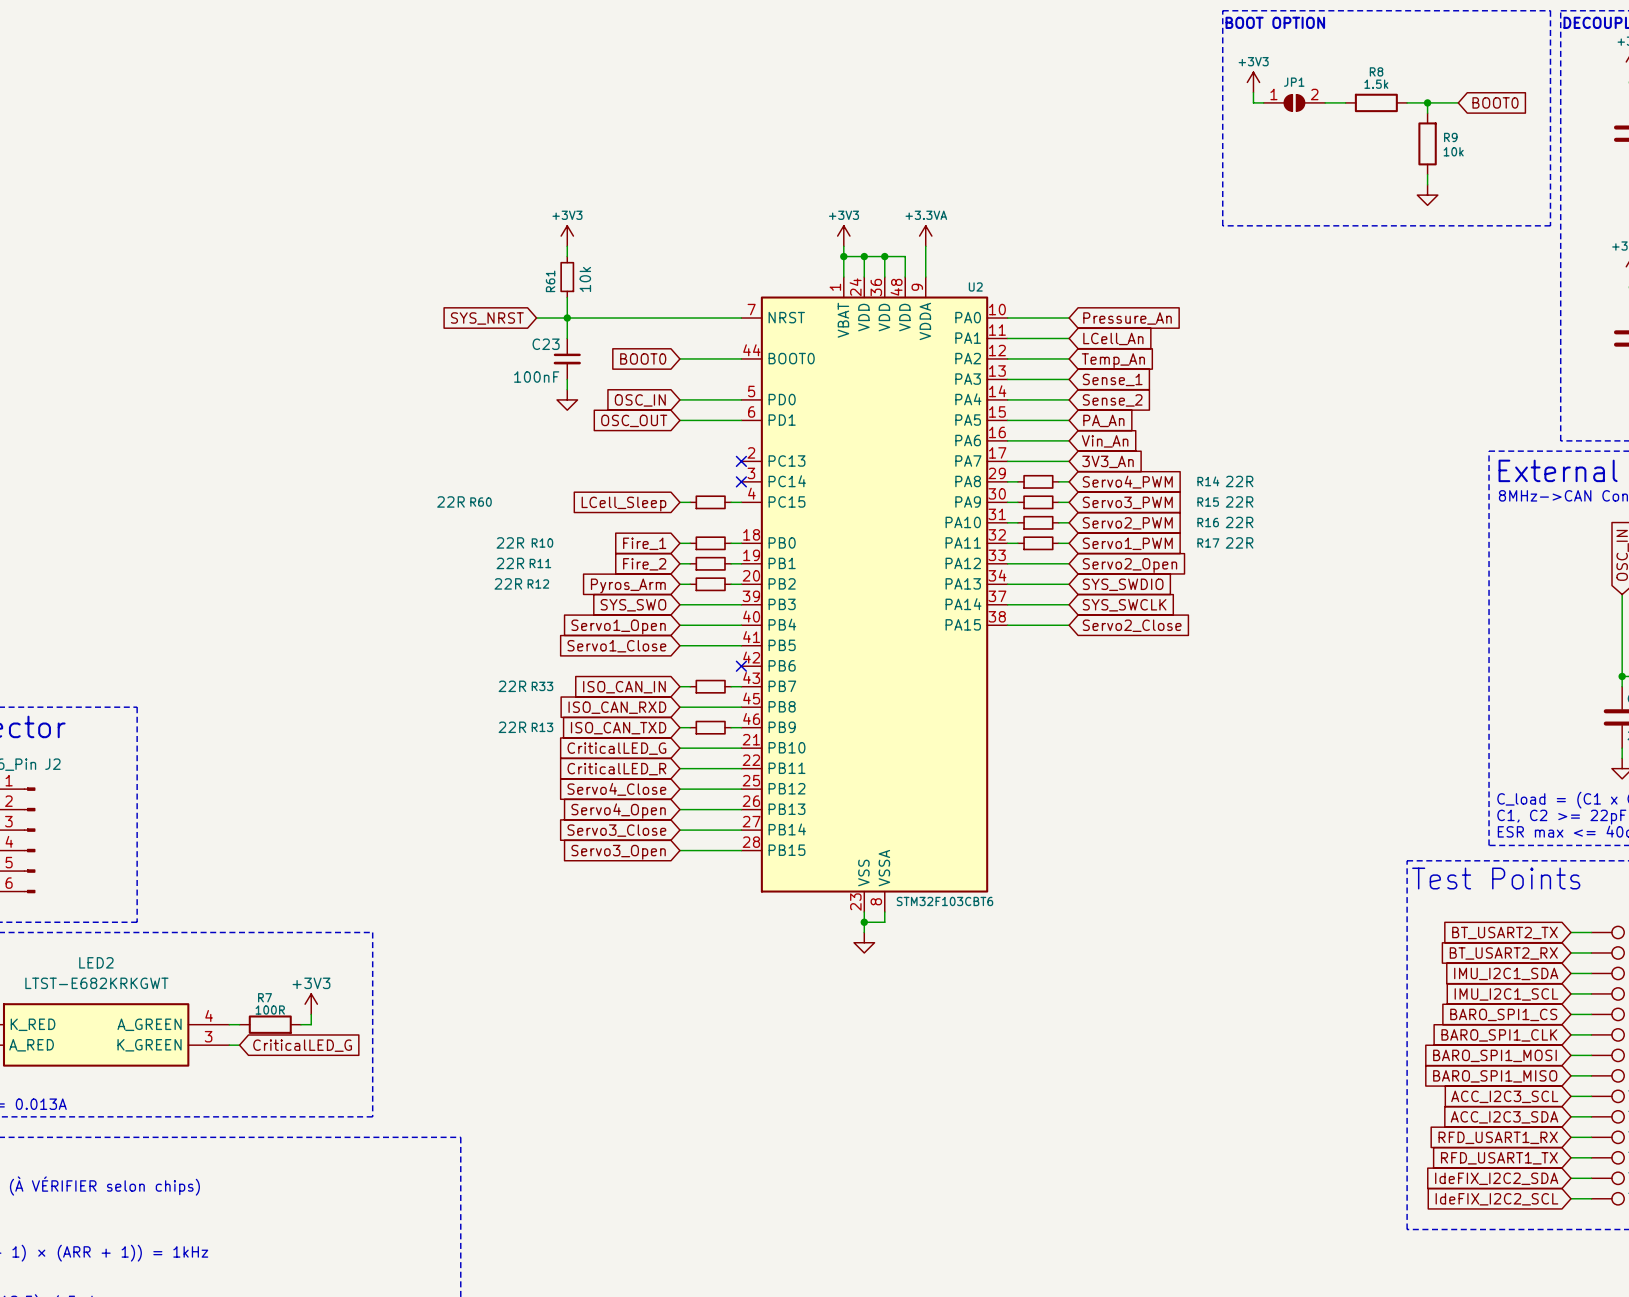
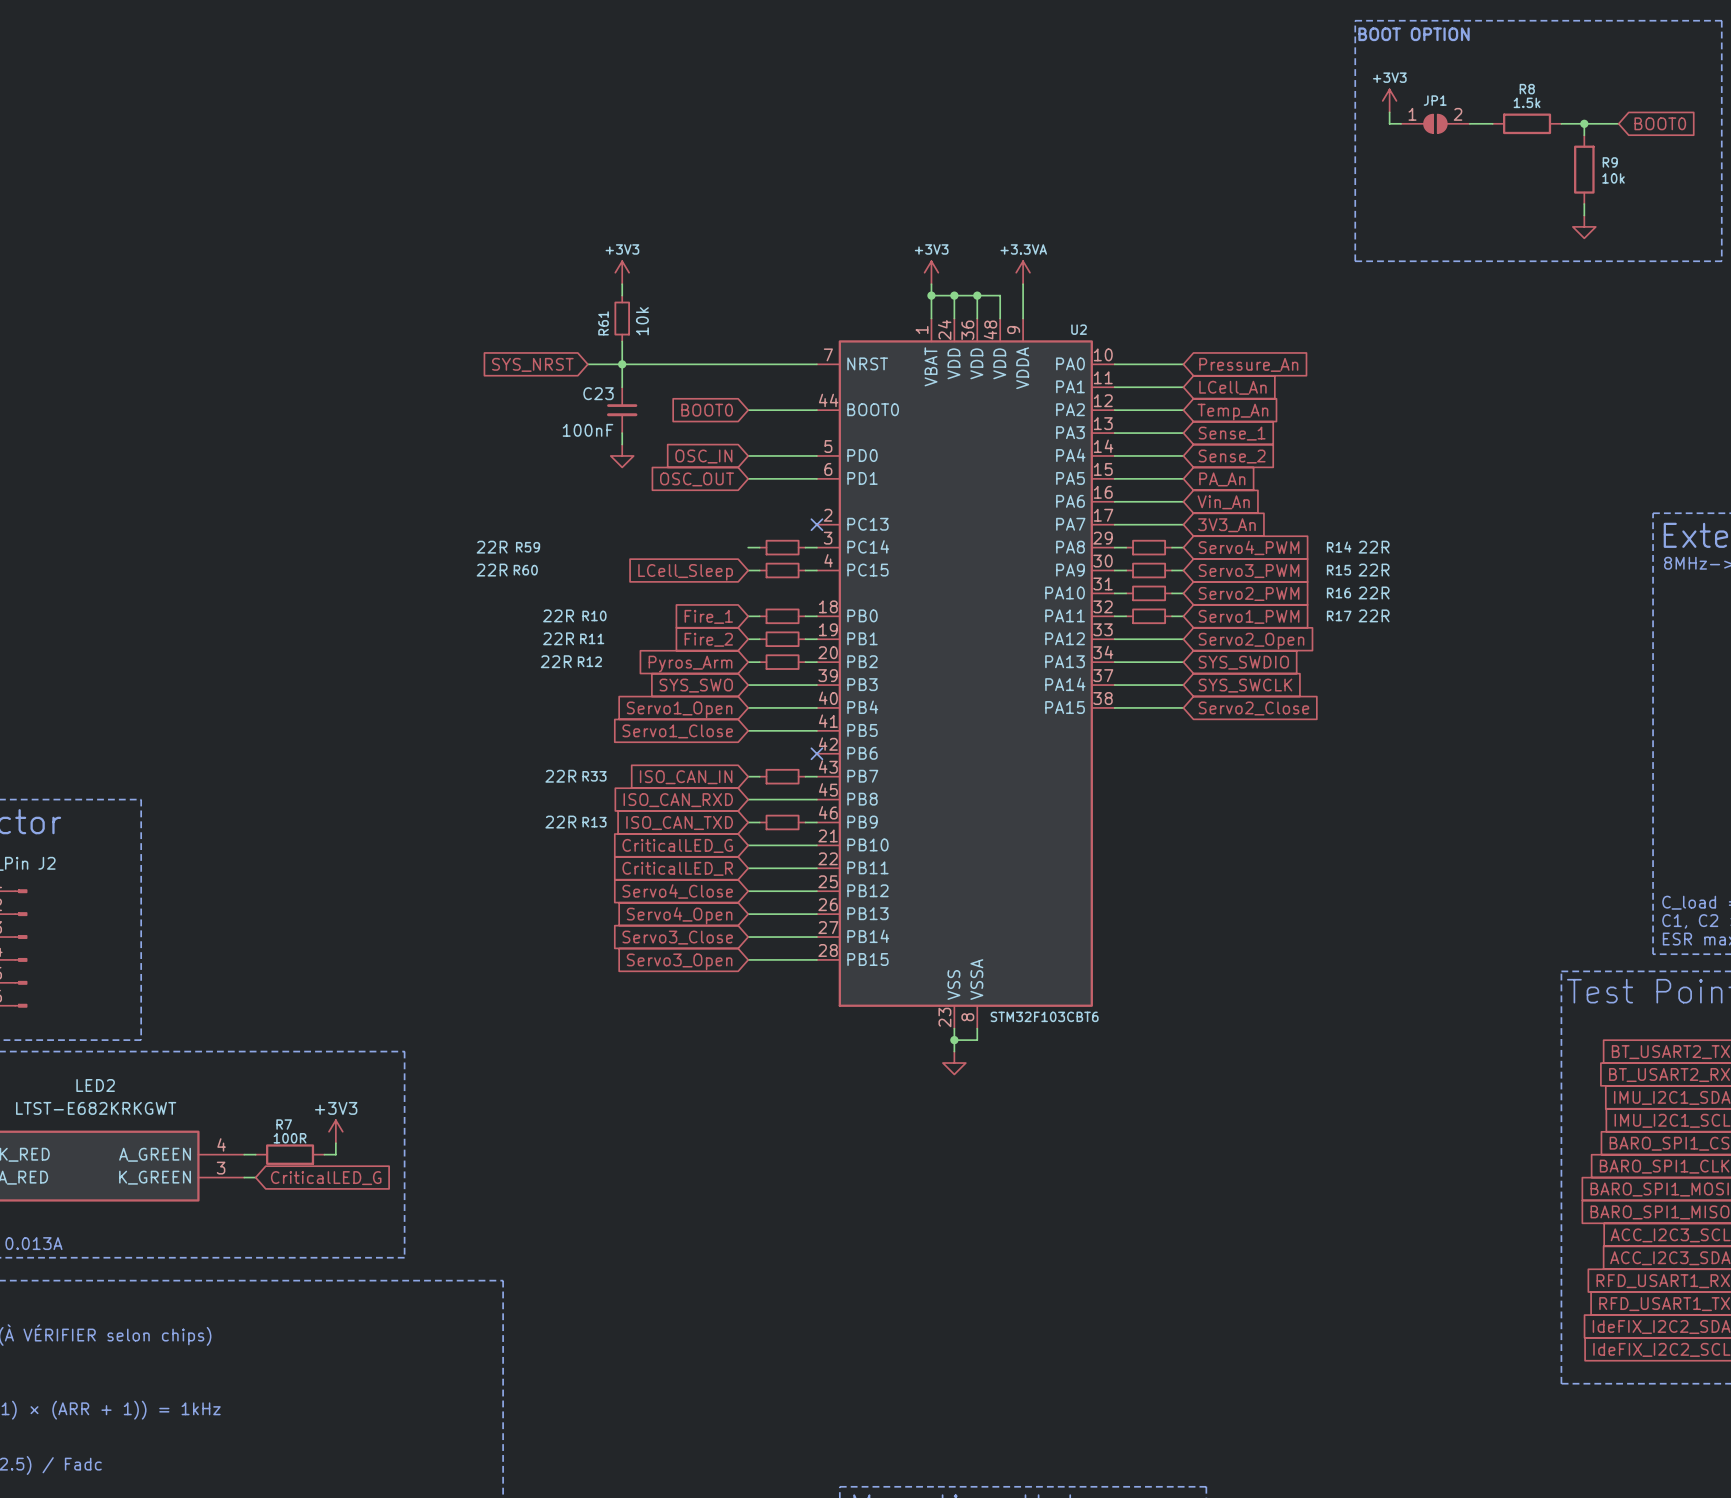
wire: none -> (748, 547) (759, 547)
R59: none -> 22R (782, 547)
wire: none -> (805, 547) (816, 547)
no-connect mark: (741, 481) -> none

